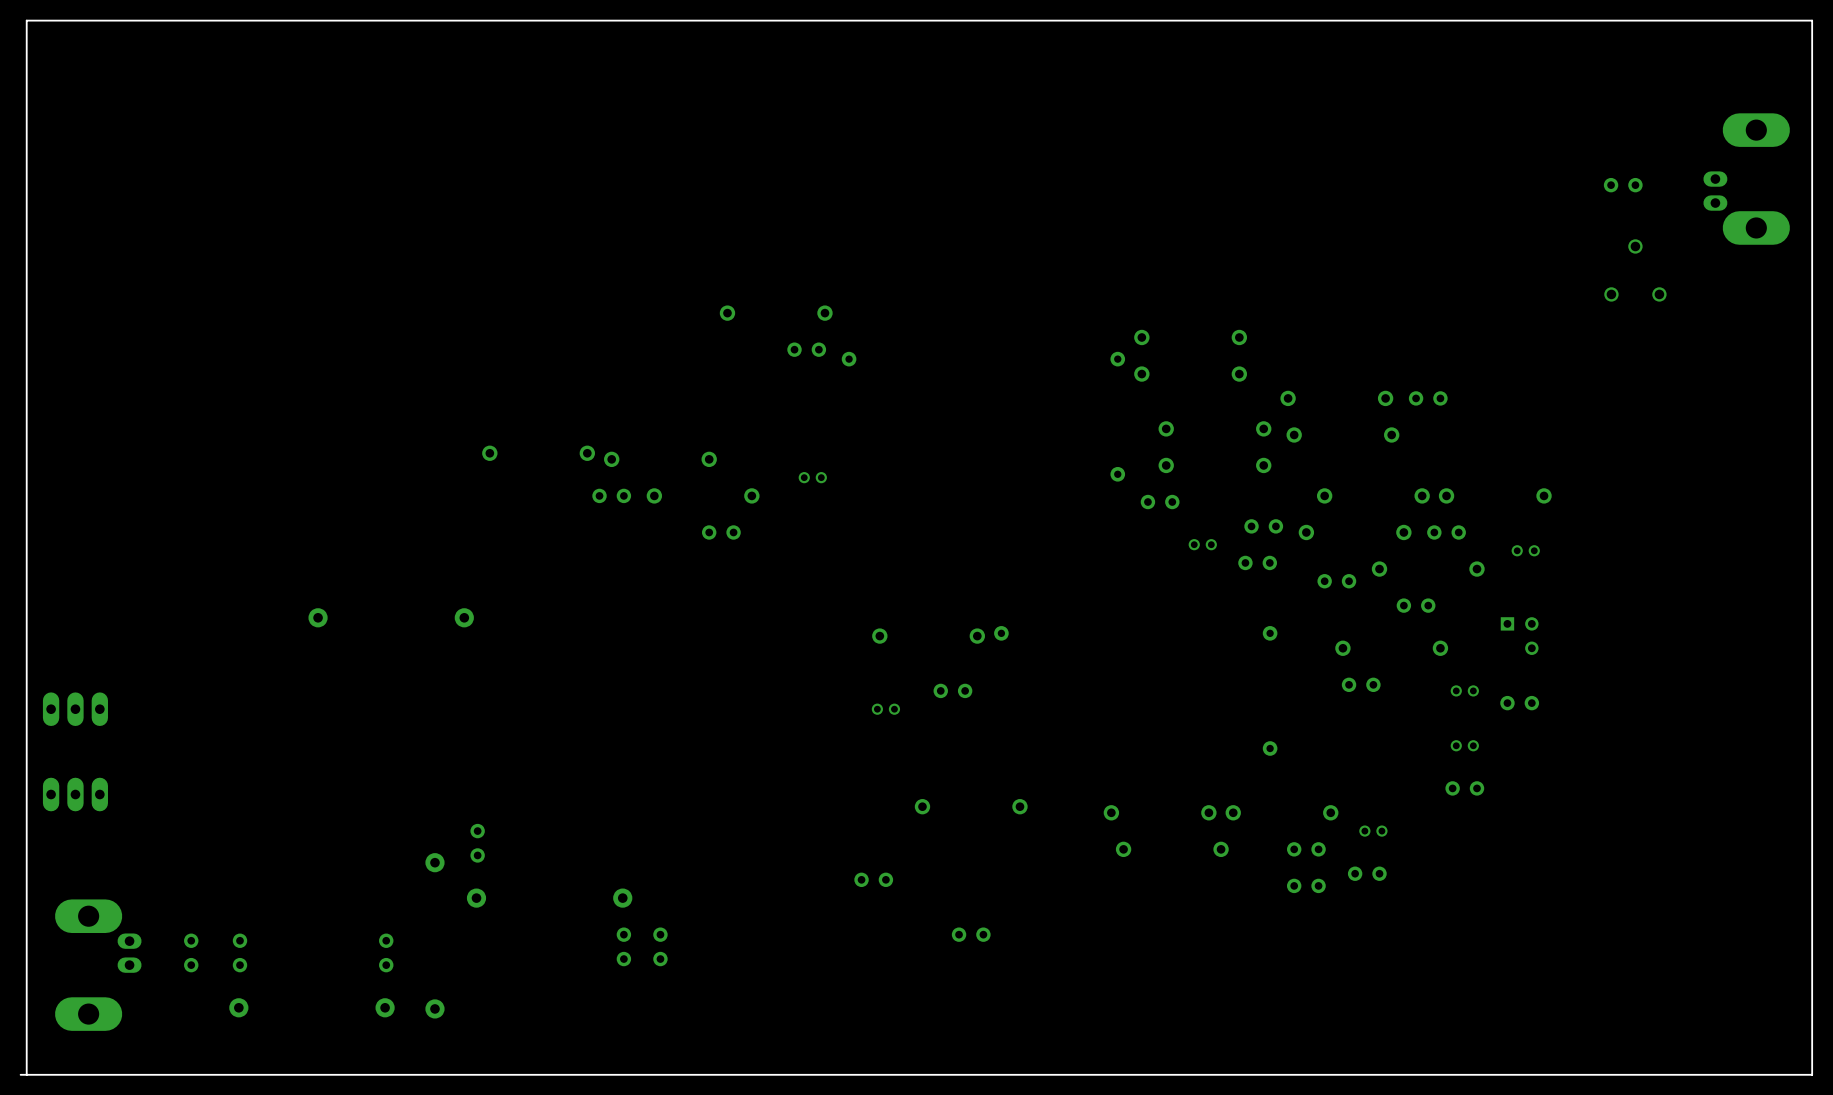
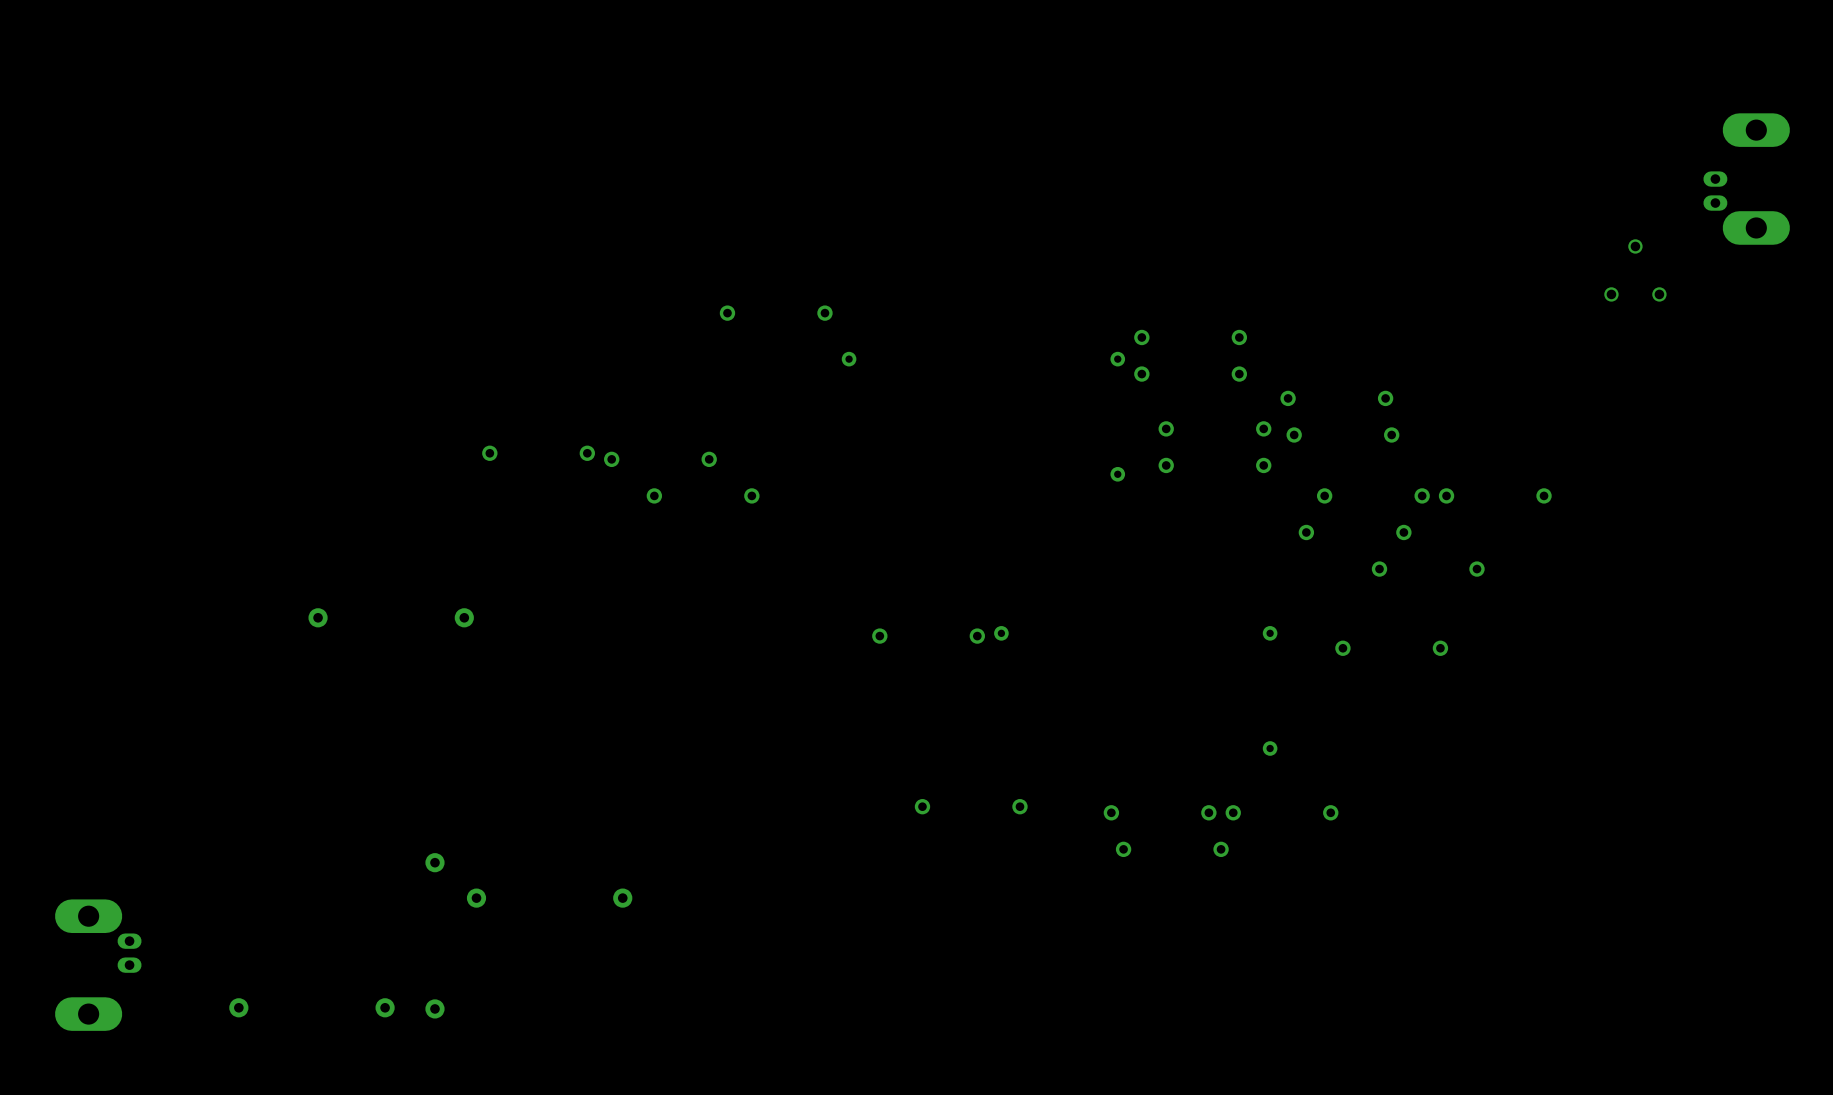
part: (1623, 185) -> none
part: (806, 349) -> none
part: (1428, 398) -> none
part: (812, 477) -> none
part: (611, 495) -> none
part: (1160, 502) -> none
part: (1263, 526) -> none
part: (721, 532) -> none
part: (1446, 532) -> none
part: (1202, 544) -> none
part: (1525, 550) -> none
part: (1257, 562) -> none
part: (1336, 581) -> none
part: (1416, 605) -> none
part: (1519, 636) -> none
part: (1361, 684) -> none
part: (952, 690) -> none
part: (1464, 690) -> none
part: (1519, 703) -> none
part: (75, 709) -> none
part: (885, 709) -> none
part: (1464, 745) -> none
part: (1464, 788) -> none
part: (75, 794) -> none
part: (1373, 831) -> none
part: (477, 843) -> none
part: (1306, 849) -> none
part: (1367, 873) -> none
part: (873, 879) -> none
part: (1306, 885) -> none
part: (971, 934) -> none
part: (623, 946) -> none
part: (660, 946) -> none
part: (191, 952) -> none
part: (239, 952) -> none
part: (386, 952) -> none
board edge: (26, 1074) (26, 20) (1812, 20) (1812, 1074) (20, 1074) -> none

